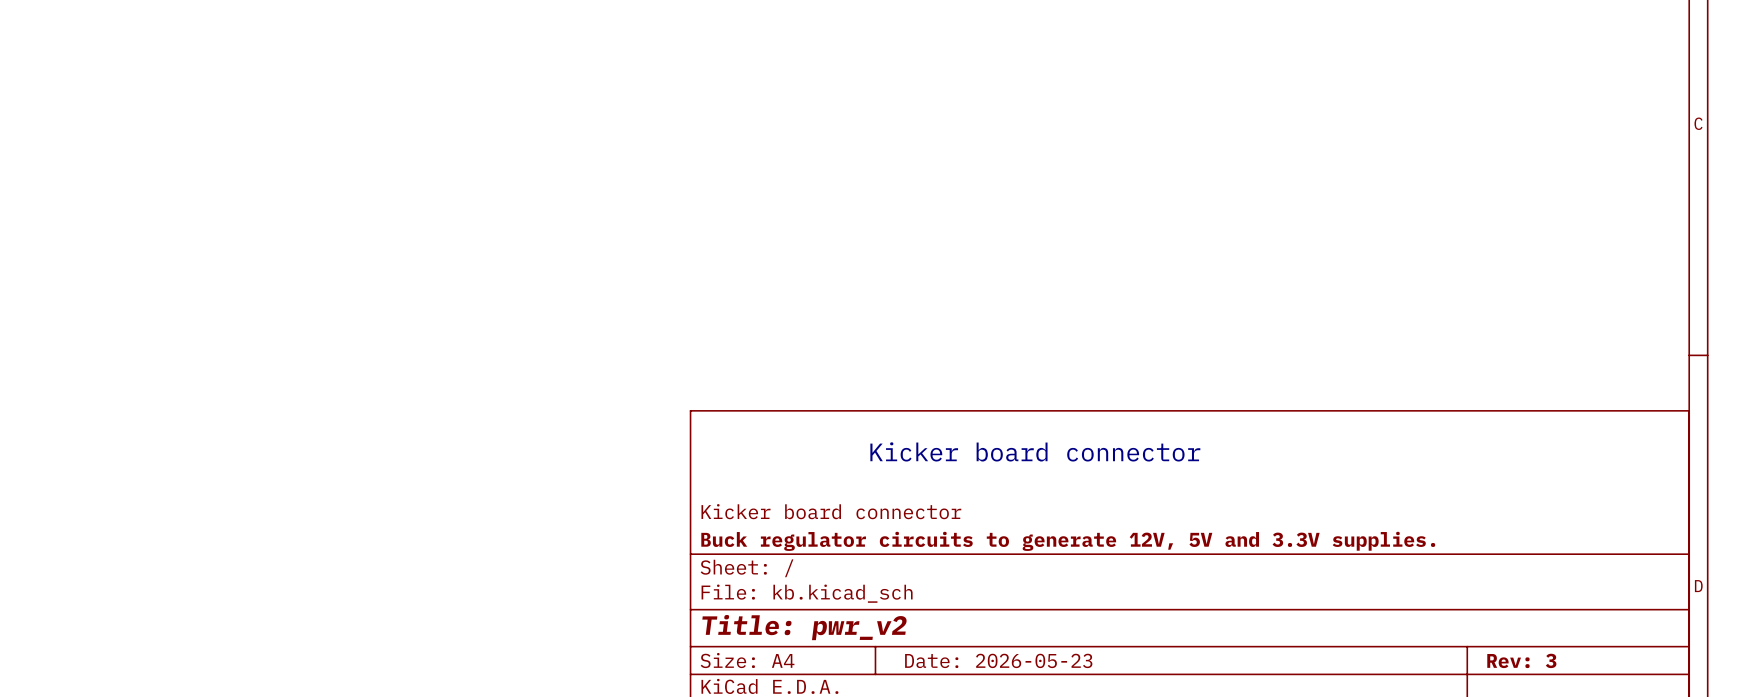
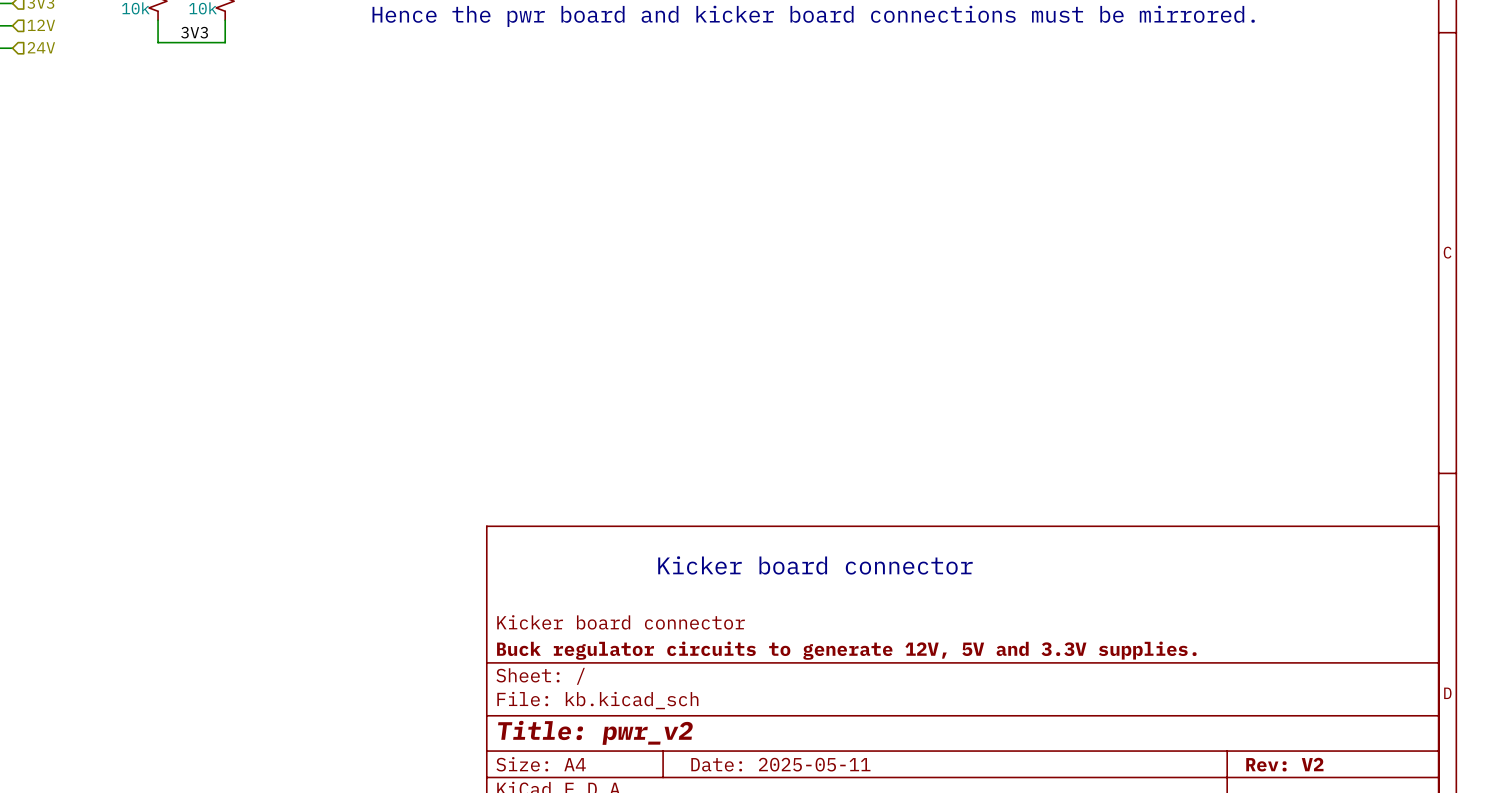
title block: Date: 2026-05-23 (998, 660) -> Date: 2025-05-11 (780, 764)
title block: Rev: 3 (1521, 660) -> Rev: V2 (1284, 764)

